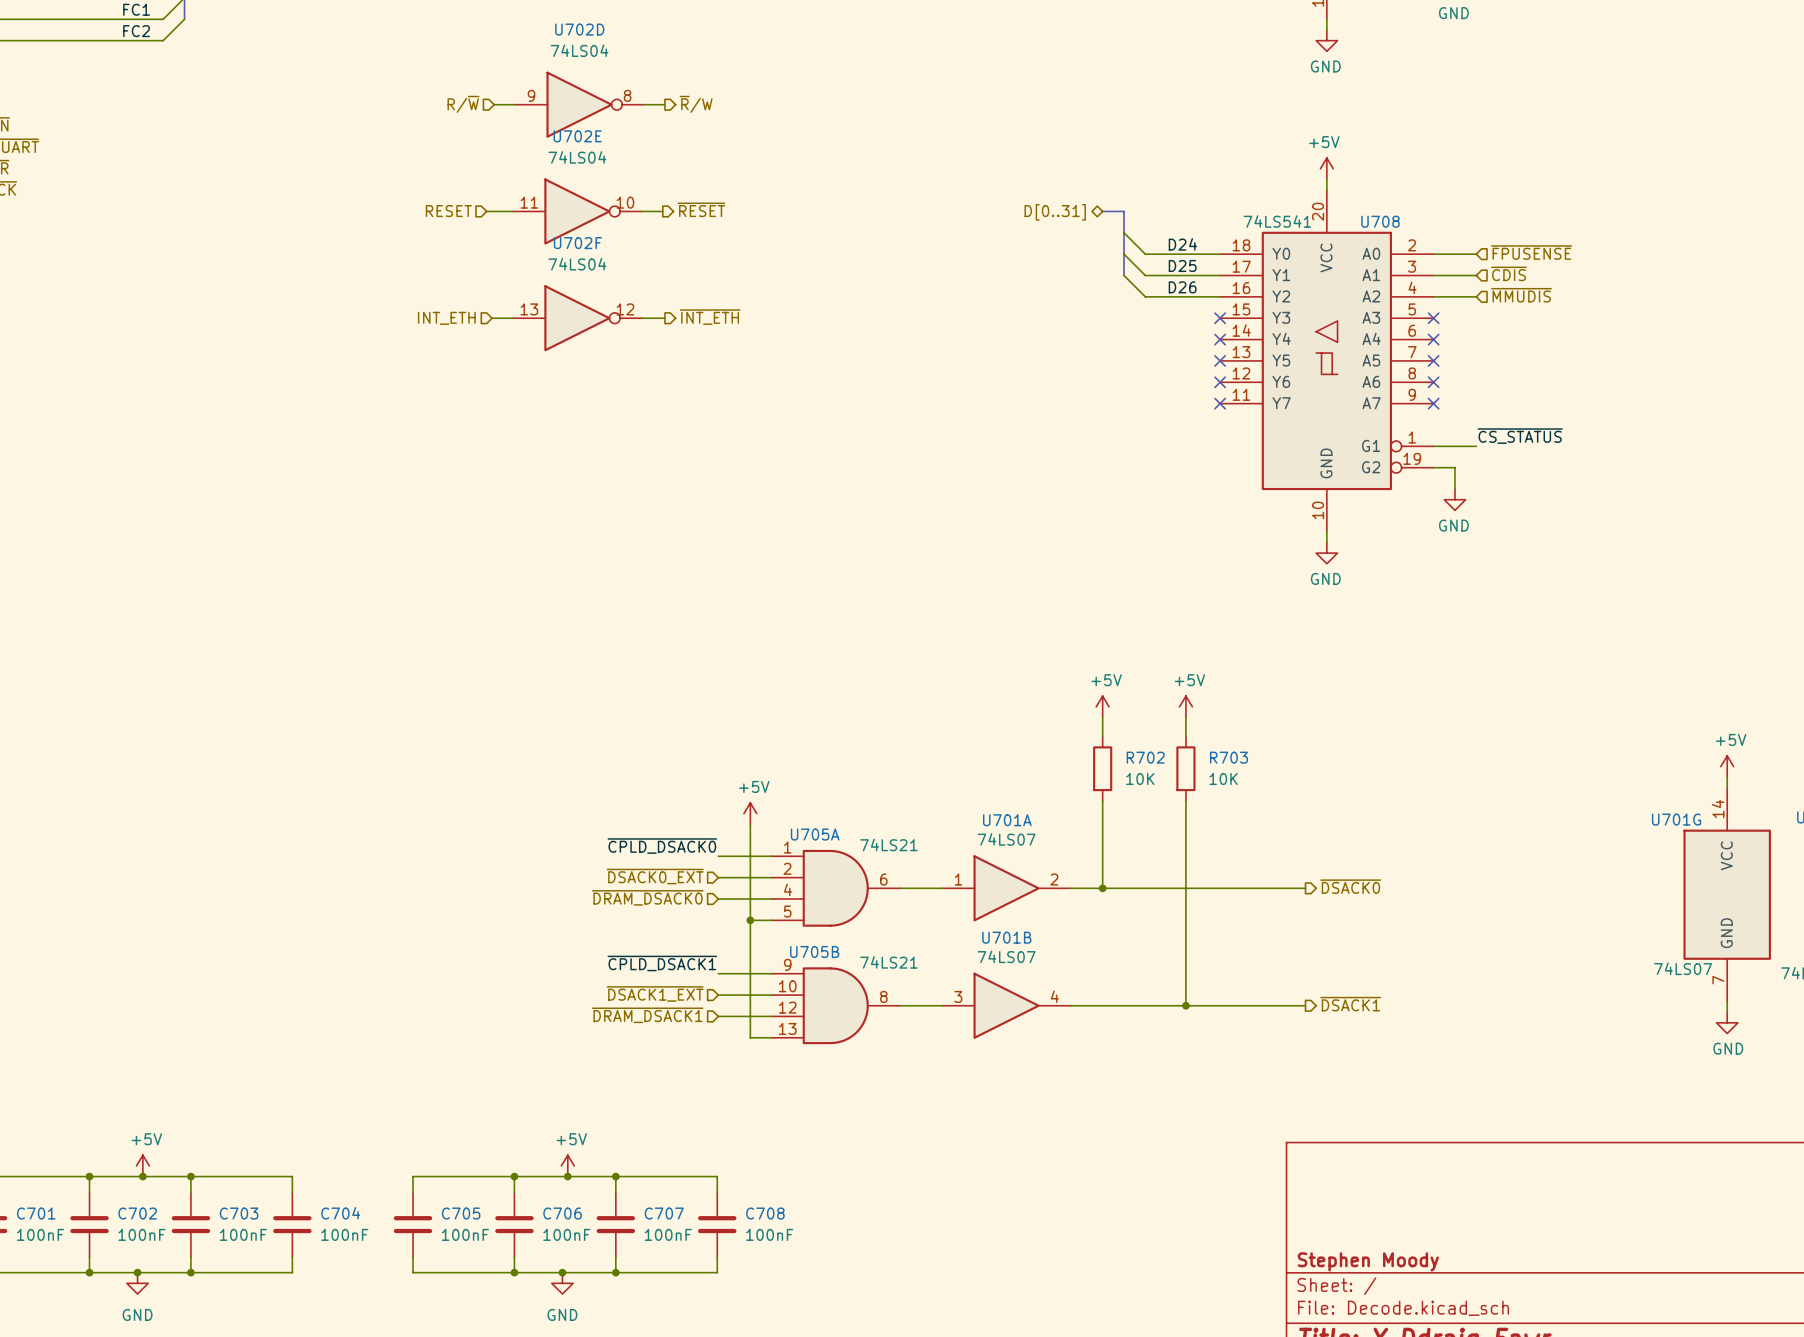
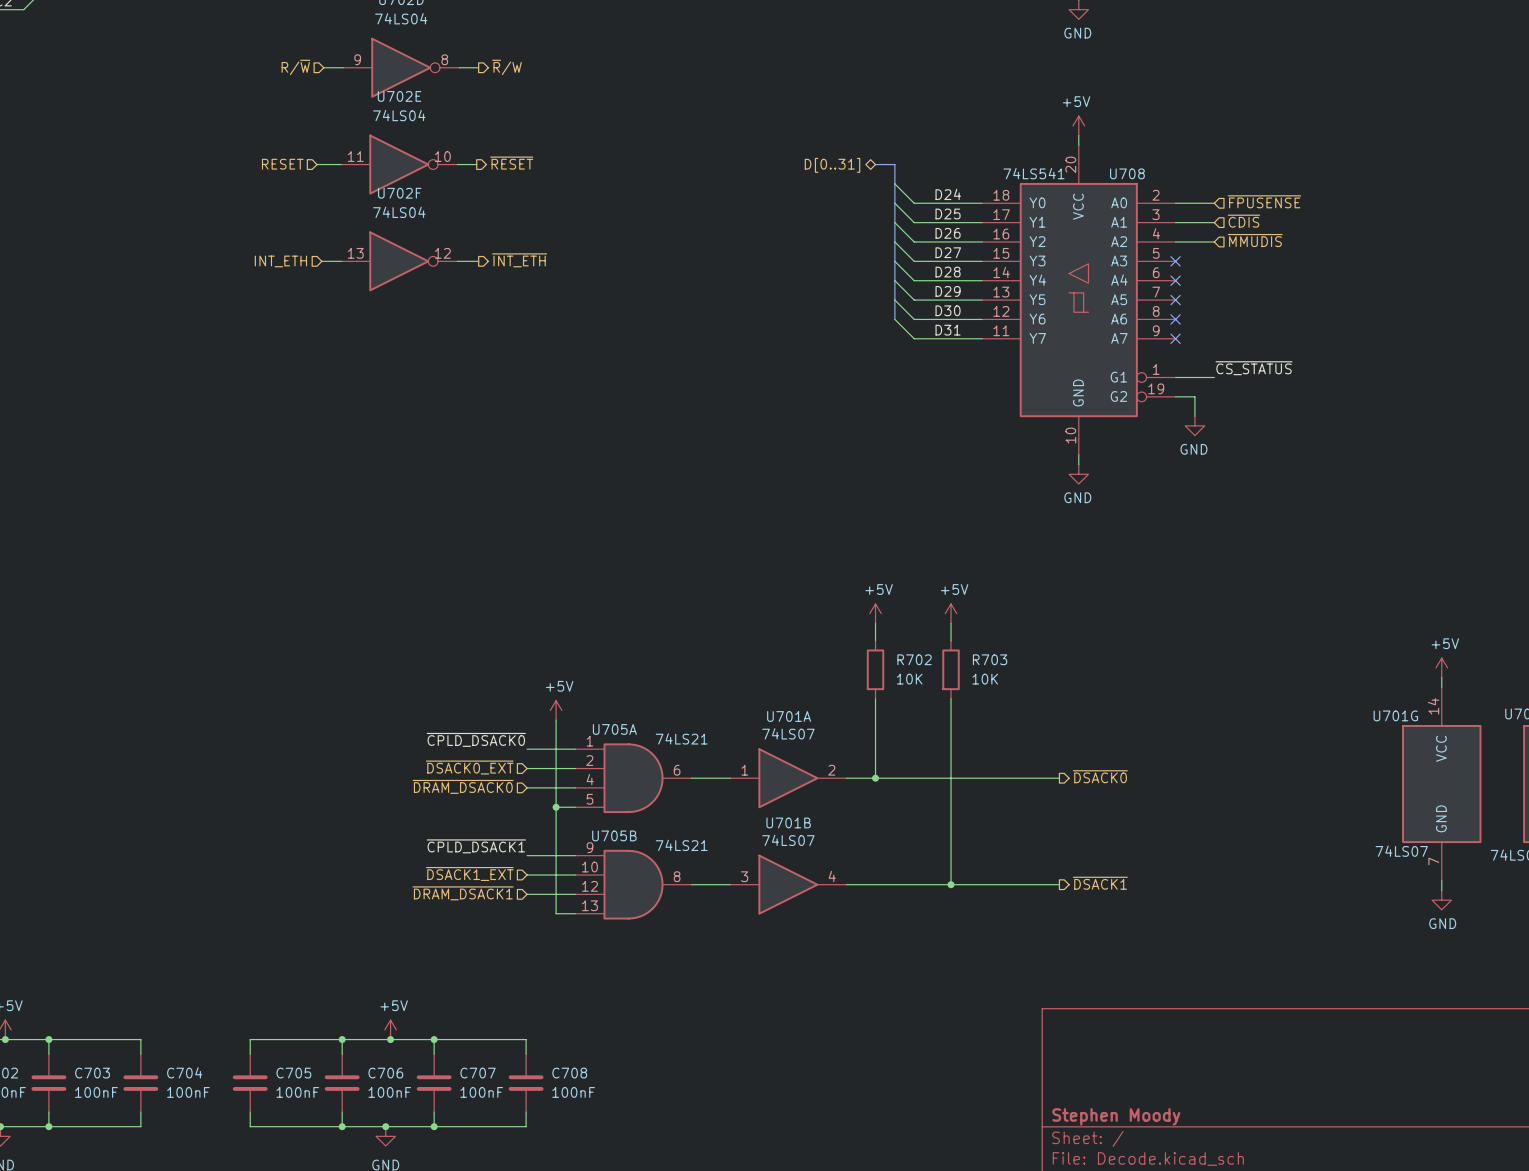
bus: none -> (894, 222) (894, 319)
wire: none -> (894, 241) (914, 261) (981, 261)
label: none -> D27 (948, 252)
wire: none -> (894, 261) (914, 280) (981, 280)
no-connect mark: (1220, 318) -> none
label: none -> D28 (948, 272)
wire: none -> (894, 280) (914, 300) (981, 300)
no-connect mark: (1220, 339) -> none
label: none -> D29 (948, 291)
wire: none -> (894, 300) (914, 319) (981, 319)
no-connect mark: (1220, 360) -> none
label: none -> D30 (948, 310)
wire: none -> (894, 319) (914, 338) (981, 338)
no-connect mark: (1220, 382) -> none
label: none -> D31 (948, 330)
no-connect mark: (1220, 403) -> none

